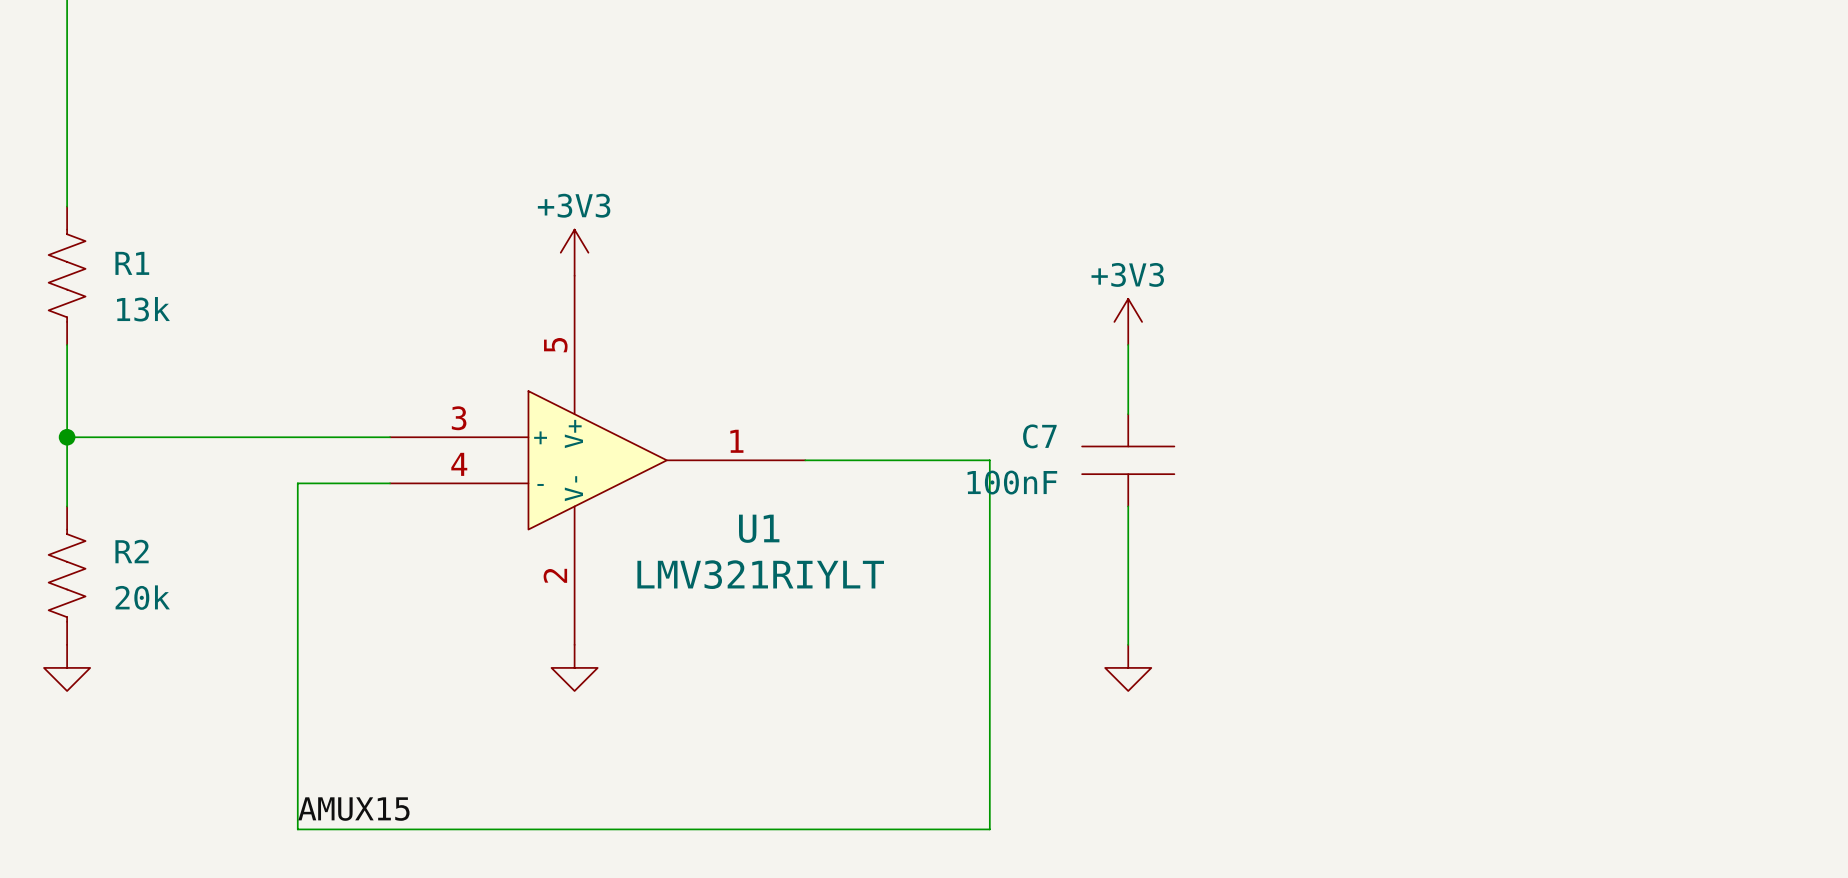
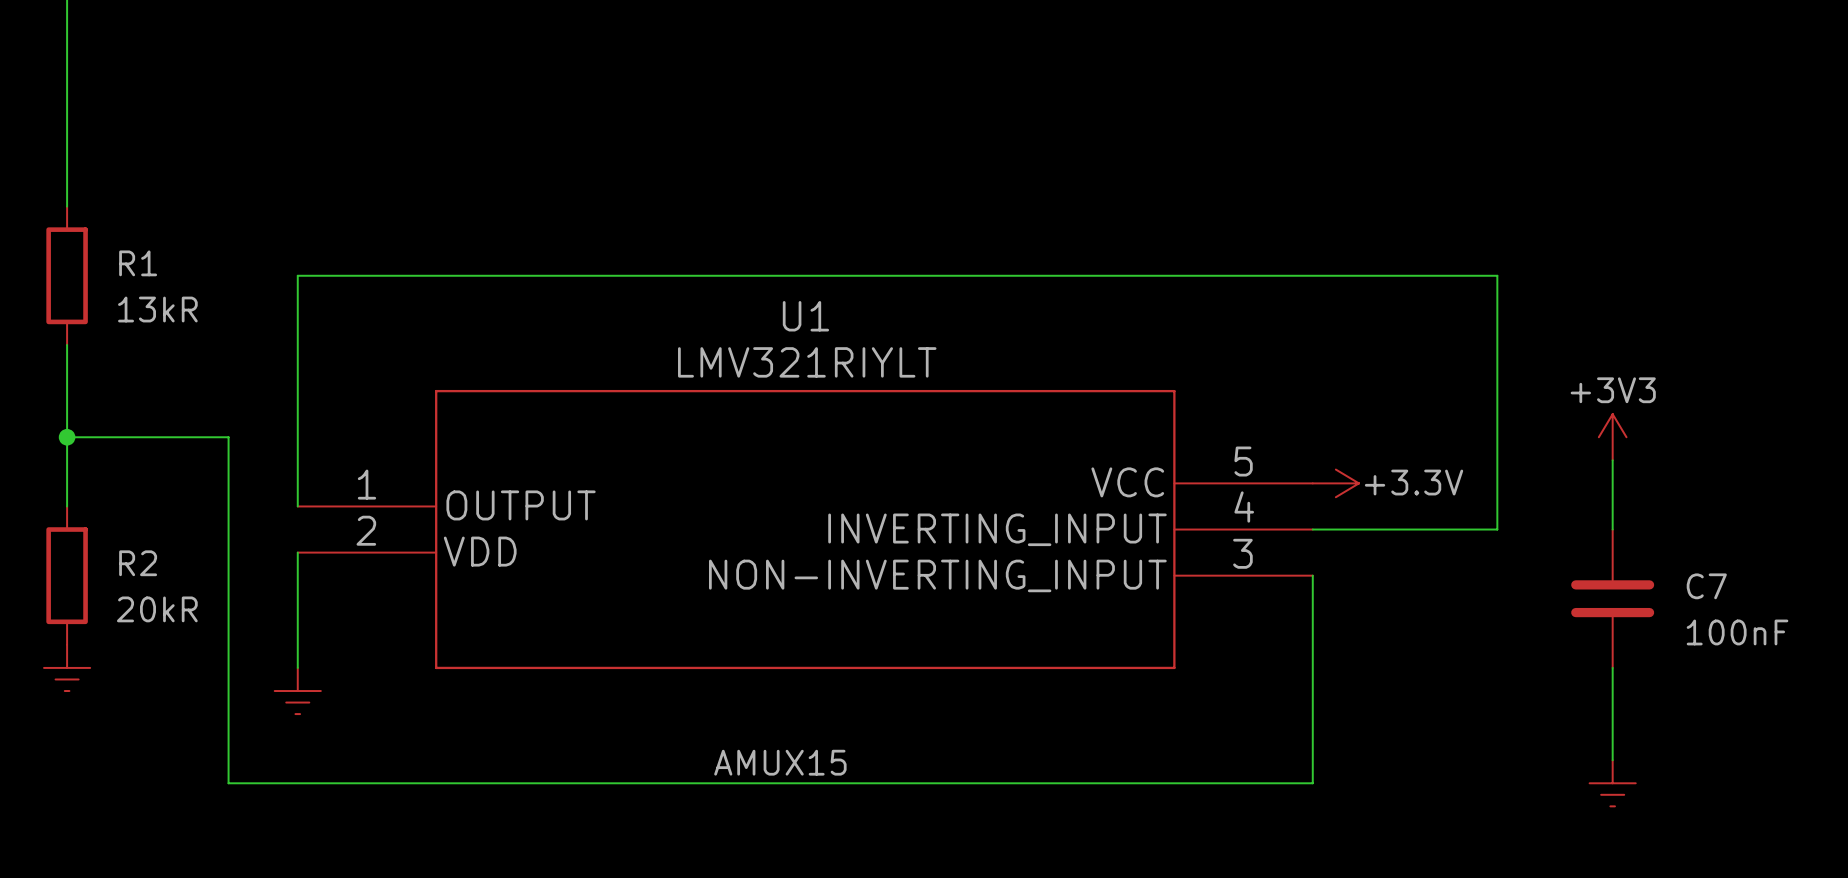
R1 symbol: [48, 206, 86, 345] -> [46, 206, 88, 345]
power symbol: +3V3 (574, 252) -> none
U1 symbol: [390, 275, 806, 645] -> [297, 389, 1313, 670]
R1 value: 13k (143, 309) -> 13kR (157, 309)
power symbol: +3V3 (1128, 321) -> none
wire: (1128, 344) (1128, 414) -> none
C7 symbol: [1082, 414, 1175, 507] -> [1571, 529, 1655, 668]
C7 name position: C7 (1039, 436) -> C7 (1706, 586)
wire: (228, 437) (390, 437) -> (228, 437) (228, 783) (1312, 783) (1312, 575)
power symbol: none -> +3V3 (1612, 437)
wire: (805, 460) (989, 460) (989, 829) (297, 829) (297, 667) -> none
wire: none -> (1612, 460) (1612, 529)
C7 value position: 100nF (1012, 482) -> 100nF (1737, 632)
wire: (297, 483) (390, 483) -> (297, 483) (297, 275) (1497, 275) (1497, 529) (1312, 529)
power symbol: none -> +3.3V (1335, 483)
R2 symbol: [48, 506, 86, 645] -> [46, 506, 88, 645]
wire: (297, 506) (297, 552) -> none
wire: (1128, 506) (1128, 644) -> none
U1 name position: U1 (759, 528) -> U1 (805, 316)
U1 value position: LMV321RIYLT (760, 574) -> LMV321RIYLT (807, 362)
R2 value: 20k (142, 597) -> 20kR (157, 609)
power symbol shape: [44, 644, 91, 692] -> [44, 644, 91, 692]
power symbol: (574, 667) -> none
power symbol: (1128, 667) -> none
wire: none -> (1612, 667) (1612, 760)
power symbol: none -> (297, 691)
label: none -> AMUX15 (780, 762)
power symbol: none -> (1612, 783)
label: AMUX15 (353, 809) -> none

